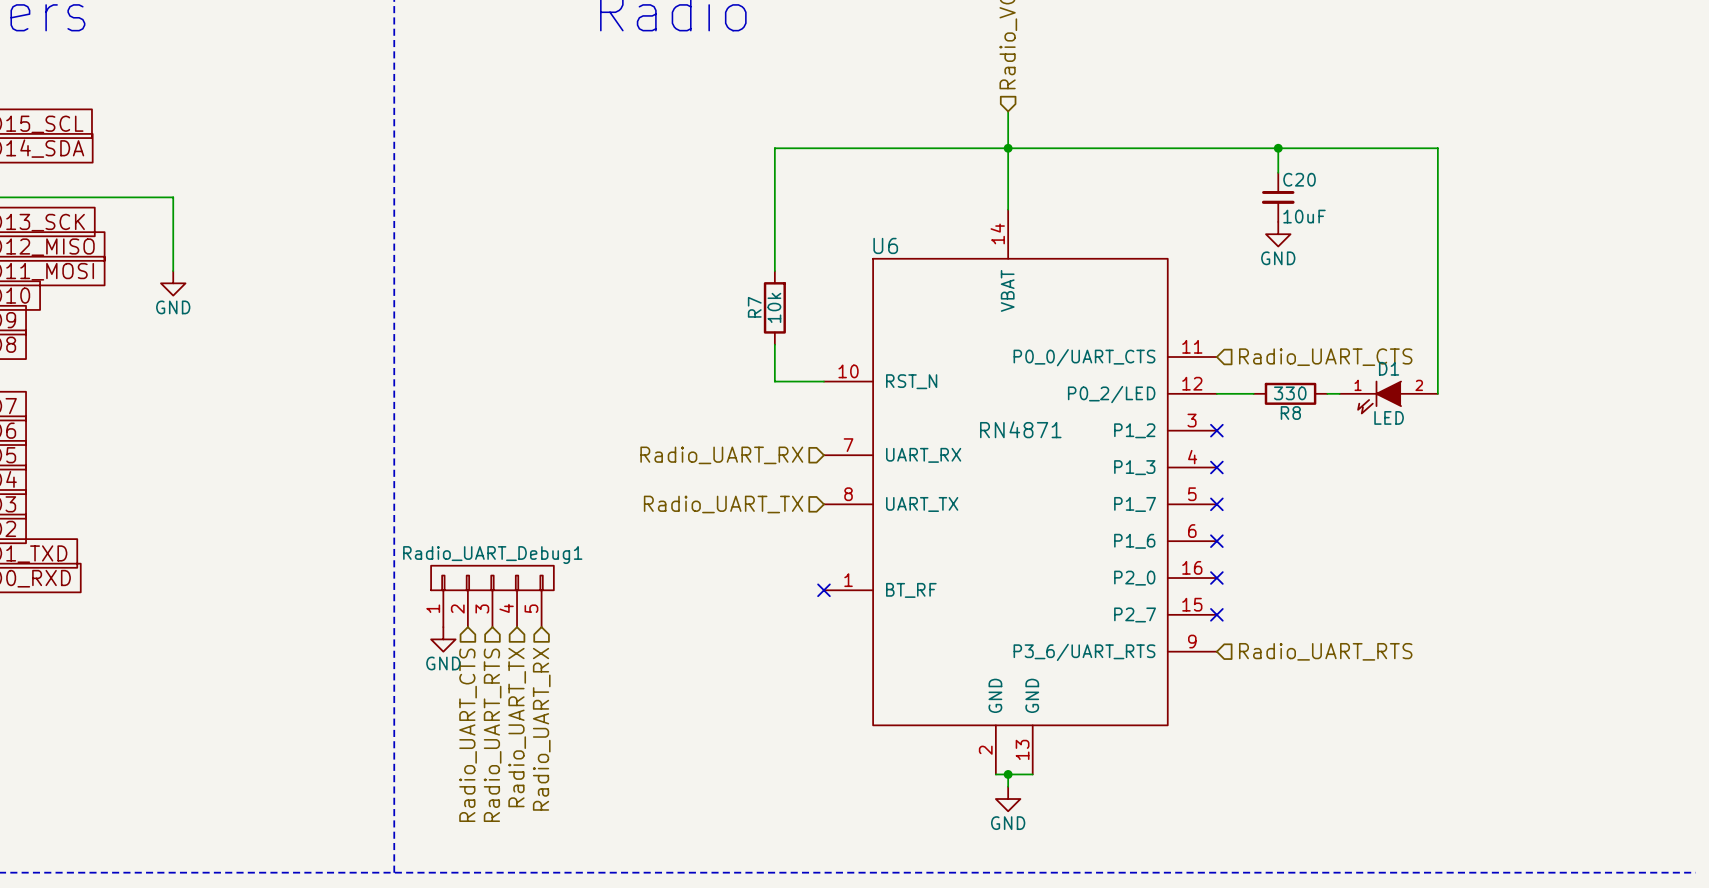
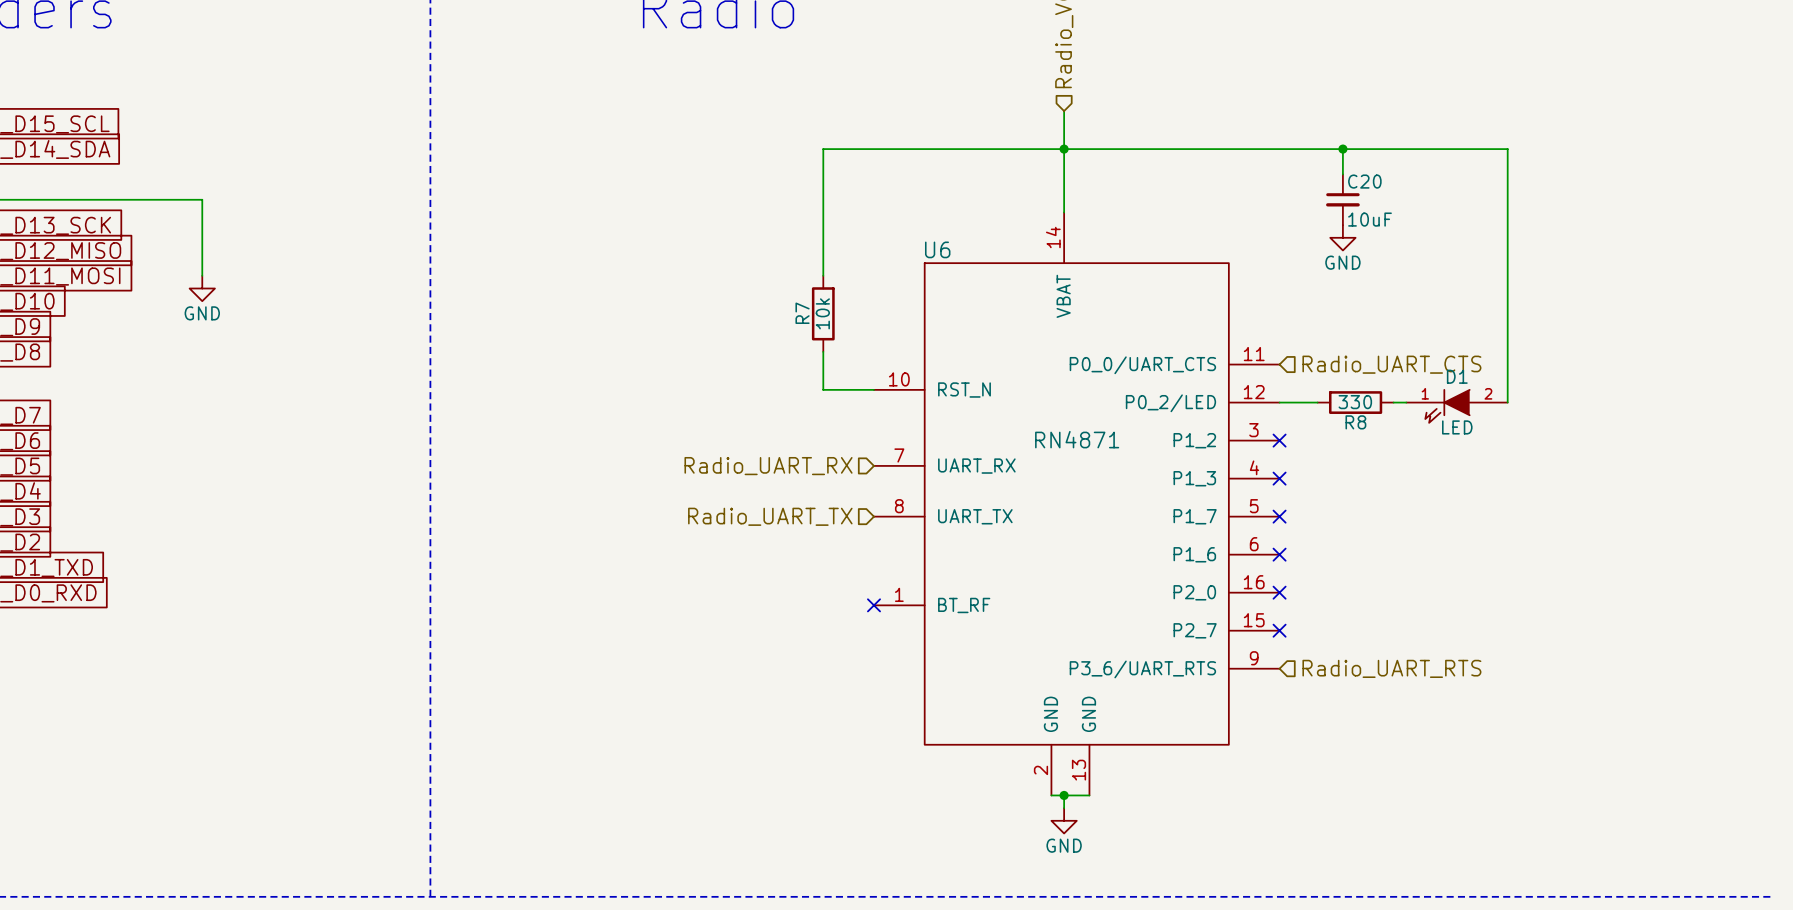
Radio_UART_Debug1: (492, 596) -> none
power symbol: GND (443, 639) -> none
hierarchical label: Radio_UART_TX (517, 727) -> none
hierarchical label: Radio_UART_RX (541, 729) -> none
hierarchical label: Radio_UART_CTS (468, 735) -> none
hierarchical label: Radio_UART_RTS (492, 735) -> none

